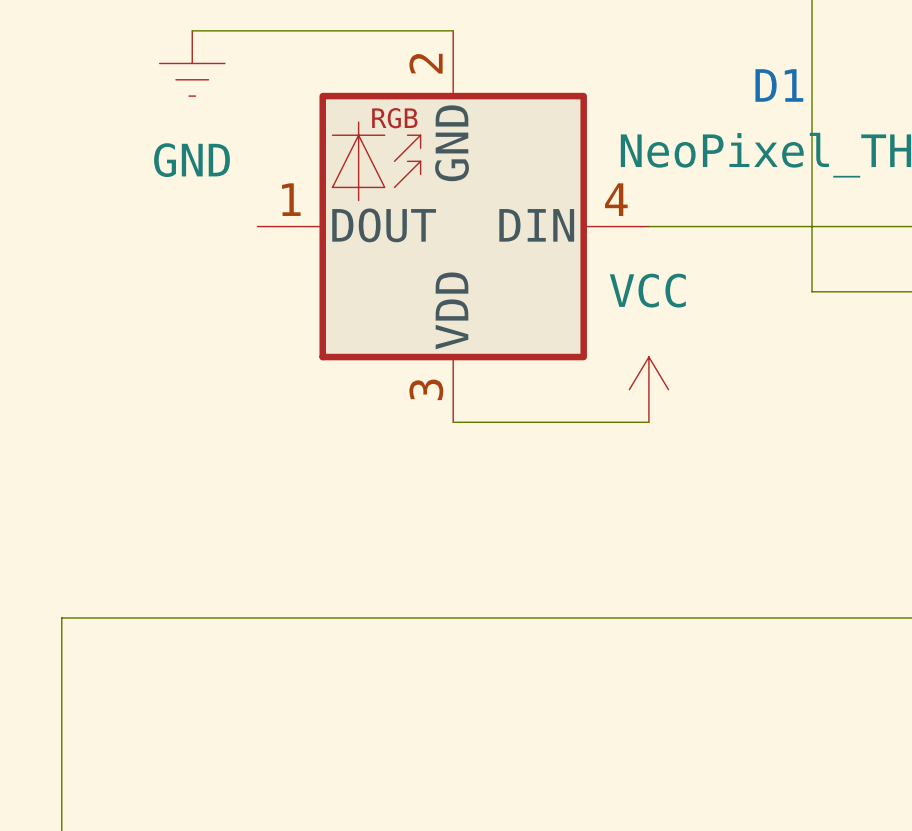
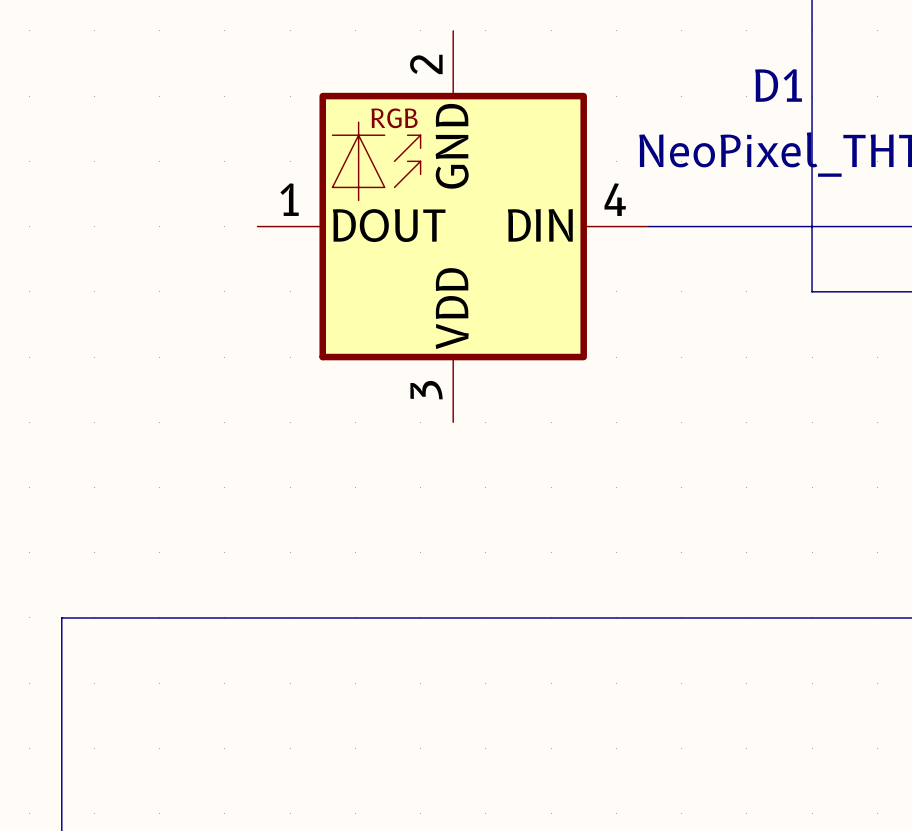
wire: (192, 30) (453, 30) -> none
power symbol: GND (192, 63) -> none
power symbol: VCC (648, 389) -> none
wire: (453, 422) (648, 422) -> none

